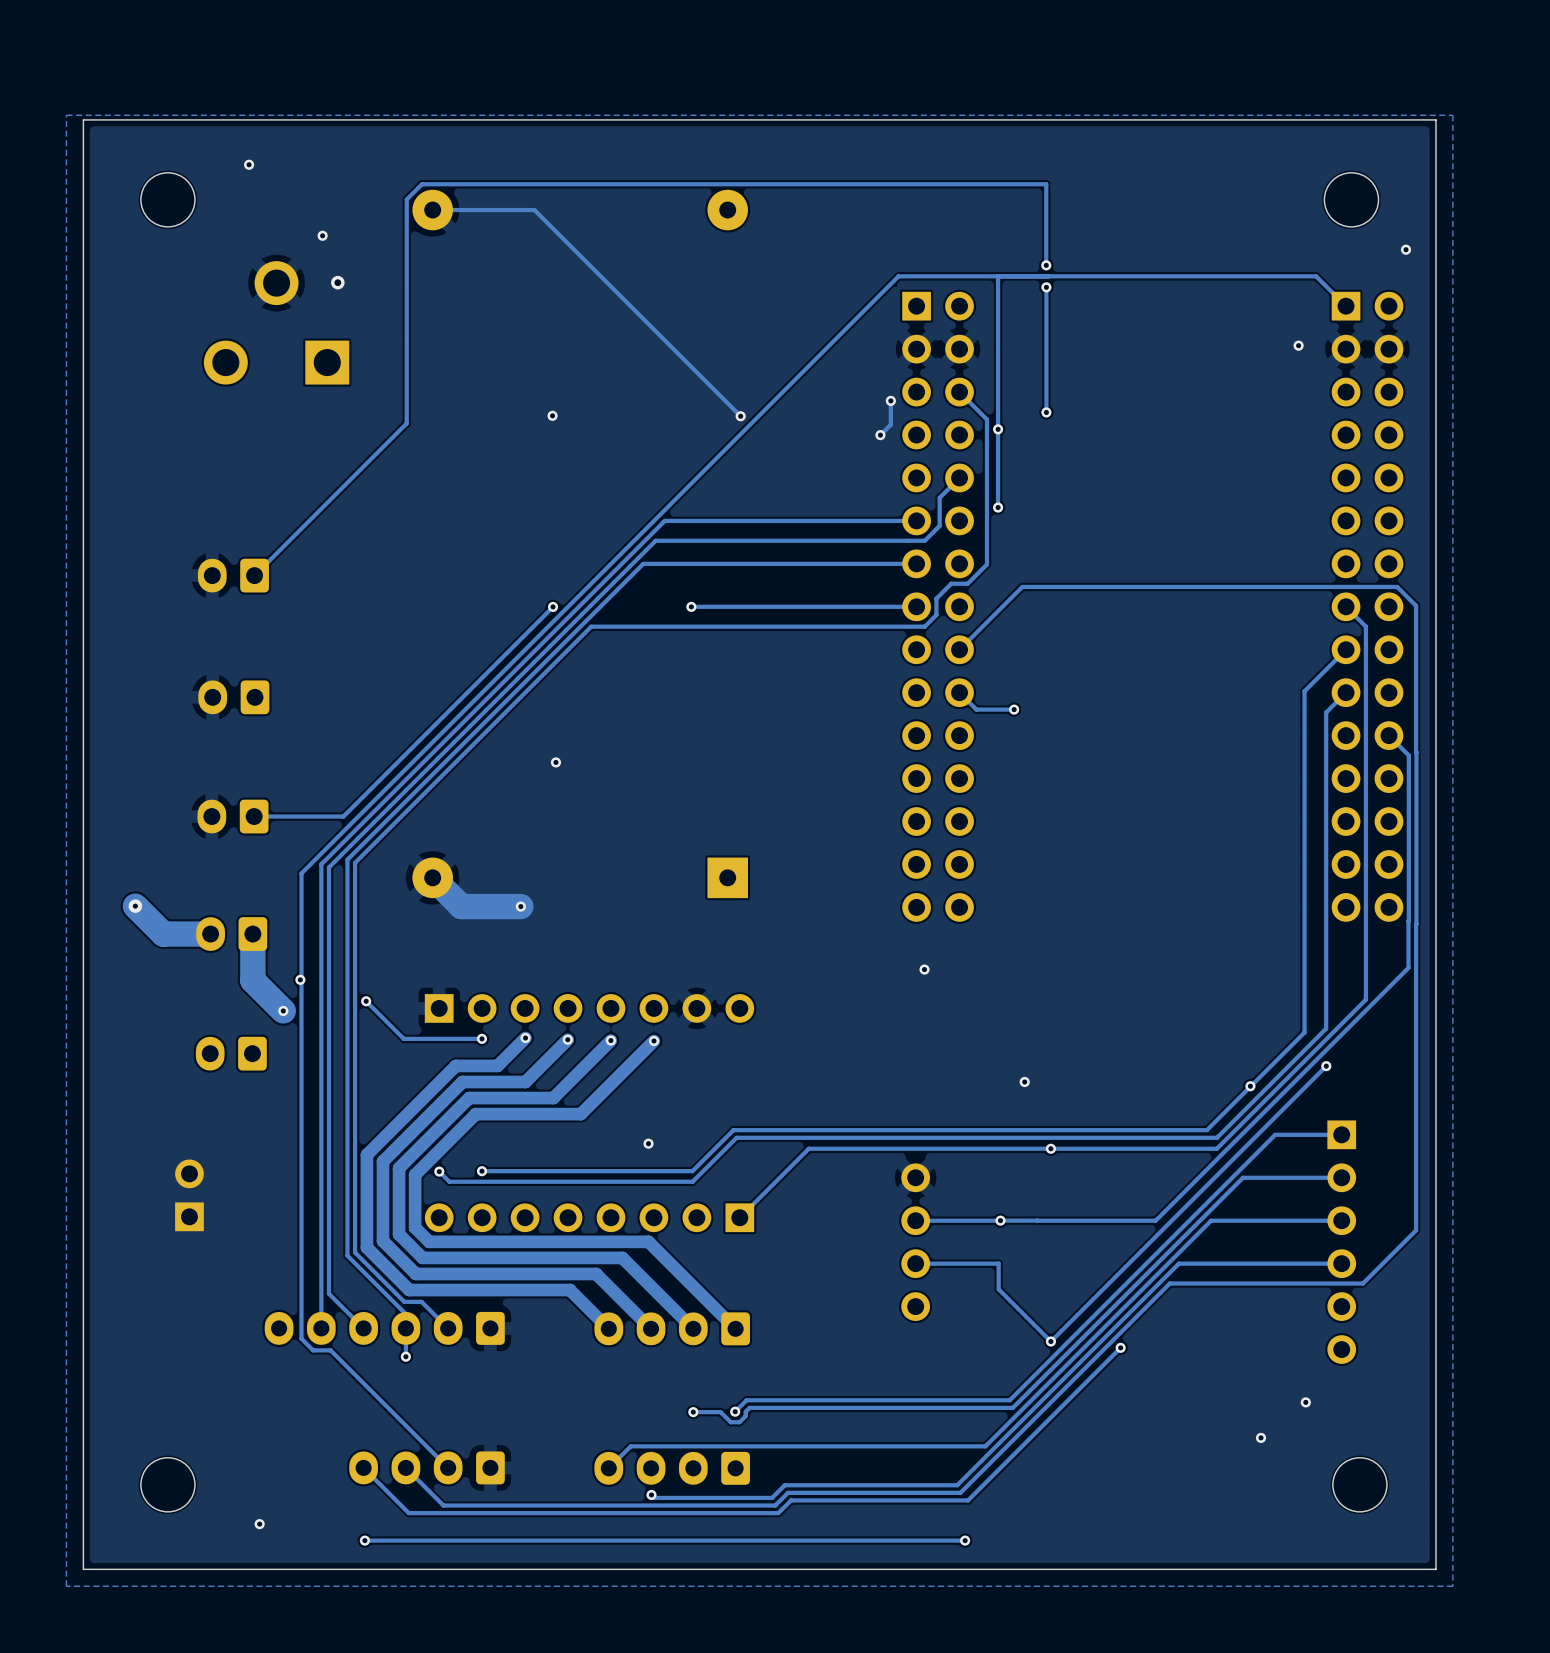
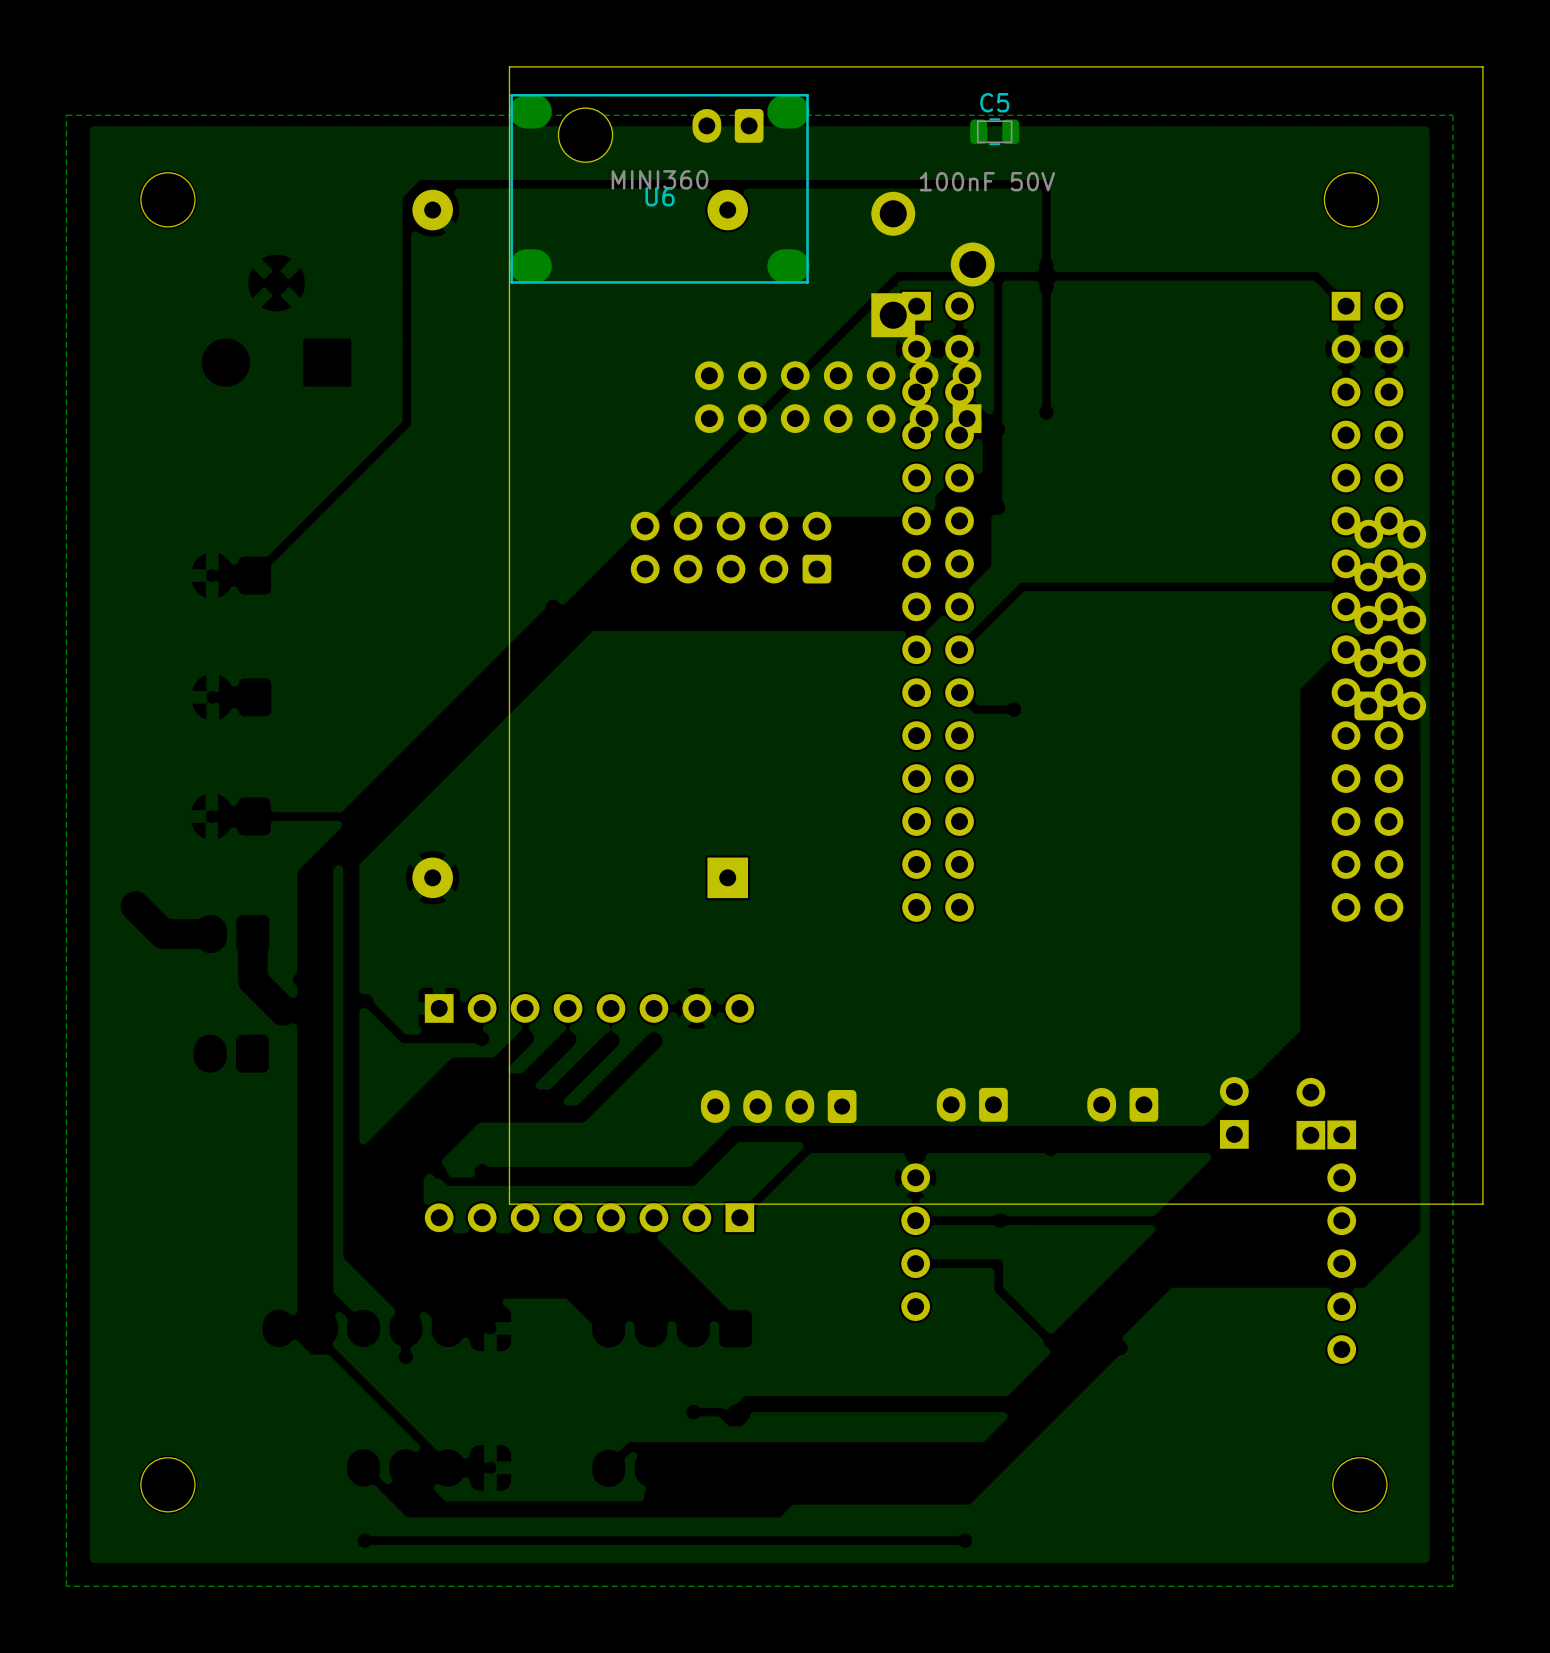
board edge: none -> (1482, 66) (509, 66) (509, 1204) (1482, 1204) (1482, 66)
board edge: (1435, 119) (83, 119) (83, 1569) (1435, 1569) (1435, 119) -> none
part: none -> (727, 125)
C5: none -> 100nF 50V (994, 131)
part: none -> (585, 135)
via: (249, 164) -> none
U6: none -> MINI360 (659, 188)
track: (432, 210) (534, 210) (740, 416) -> none
via: (322, 235) -> none
via: (1405, 249) -> none
part: none -> (932, 264)
track: (1046, 265) (1046, 184) (422, 184) (406, 199) (406, 423) (254, 575) -> none
via: (1046, 265) -> none
track: (998, 276) (998, 507) -> none
via: (337, 282) -> none
track: (1046, 287) (1046, 412) -> none
via: (1046, 287) -> none
track: (1346, 306) (1316, 276) (898, 276) (301, 873) (301, 1338) (313, 1350) (330, 1350) (448, 1467) -> none
part: (276, 322) -> none
via: (1298, 345) -> none
track: (959, 392) (987, 419) (987, 564) (967, 583) (951, 583) (936, 598) (936, 615) (924, 626) (591, 626) (355, 862) (355, 1252) (404, 1301) (421, 1301) (448, 1328) -> none
part: none -> (838, 397)
track: (890, 400) (890, 424) (880, 435) -> none
via: (890, 400) -> none
via: (1046, 412) -> none
via: (552, 415) -> none
via: (740, 416) -> none
via: (998, 429) -> none
via: (880, 435) -> none
track: (959, 477) (939, 497) (939, 525) (924, 540) (655, 540) (328, 867) (328, 1293) (363, 1328) -> none
via: (998, 507) -> none
track: (916, 520) (664, 520) (321, 864) (321, 1328) -> none
part: none -> (731, 547)
track: (916, 563) (643, 563) (347, 859) (347, 1255) (405, 1314) (405, 1356) -> none
part: (233, 575) -> none
track: (553, 606) (343, 816) (254, 816) -> none
via: (553, 606) -> none
via: (691, 606) -> none
track: (916, 606) (691, 606) -> none
track: (1346, 606) (1365, 626) (1365, 999) (1216, 1148) (808, 1148) (739, 1217) -> none
part: none -> (1390, 620)
track: (959, 649) (1022, 586) (1397, 586) (1416, 605) (1416, 1230) (1362, 1283) (1169, 1283) (960, 1492) (787, 1492) (775, 1505) (443, 1505) (405, 1467) -> none
track: (1346, 649) (1304, 691) (1304, 1032) (1206, 1130) (733, 1130) (692, 1171) (481, 1171) -> none
track: (959, 692) (976, 709) (1014, 709) -> none
track: (1346, 692) (1326, 712) (1326, 1028) (1217, 1137) (736, 1137) (692, 1181) (449, 1181) (439, 1171) -> none
part: (233, 697) -> none
via: (1014, 709) -> none
track: (1388, 735) (1408, 755) (1408, 967) (1155, 1220) (915, 1220) -> none
via: (555, 762) -> none
part: (233, 816) -> none
track: (432, 877) (461, 906) (520, 906) -> none
track: (135, 906) (163, 934) (210, 934) -> none
via: (135, 906) -> none
via: (520, 906) -> none
part: (231, 934) -> none
track: (252, 934) (252, 980) (283, 1010) -> none
via: (924, 969) -> none
via: (300, 979) -> none
track: (366, 1001) (403, 1038) (481, 1038) -> none
via: (366, 1001) -> none
via: (283, 1010) -> none
via: (481, 1038) -> none
track: (525, 1038) (497, 1065) (455, 1065) (366, 1154) (366, 1247) (409, 1290) (569, 1290) (608, 1328) -> none
via: (525, 1038) -> none
track: (567, 1039) (525, 1081) (462, 1081) (382, 1161) (382, 1241) (415, 1273) (596, 1273) (651, 1328) -> none
via: (567, 1039) -> none
track: (610, 1040) (553, 1098) (469, 1098) (399, 1168) (399, 1234) (422, 1257) (622, 1257) (693, 1328) -> none
via: (610, 1040) -> none
track: (654, 1040) (580, 1114) (475, 1114) (415, 1174) (415, 1227) (429, 1241) (648, 1241) (735, 1328) -> none
via: (654, 1040) -> none
part: (231, 1053) -> none
track: (1326, 1066) (1050, 1341) (998, 1289) (998, 1263) (915, 1263) -> none
via: (1326, 1066) -> none
via: (1024, 1081) -> none
via: (1250, 1086) -> none
part: none -> (972, 1104)
part: none -> (1122, 1104)
part: none -> (778, 1106)
part: none -> (1234, 1112)
part: none -> (1310, 1113)
track: (1341, 1134) (1275, 1134) (1009, 1400) (746, 1400) (735, 1411) -> none
via: (648, 1143) -> none
via: (1050, 1148) -> none
via: (439, 1171) -> none
via: (481, 1171) -> none
track: (1341, 1177) (1243, 1177) (1012, 1407) (749, 1407) (739, 1422) (730, 1422) (720, 1412) (693, 1412) -> none
part: (189, 1195) -> none
via: (1000, 1220) -> none
track: (1341, 1220) (1211, 1220) (985, 1446) (630, 1446) (608, 1468) -> none
track: (1341, 1263) (1178, 1263) (957, 1485) (784, 1485) (772, 1497) (654, 1497) (651, 1494) -> none
part: (384, 1328) -> none
part: (672, 1328) -> none
via: (1050, 1341) -> none
track: (1120, 1347) (968, 1500) (791, 1500) (778, 1513) (408, 1513) (363, 1467) -> none
via: (1120, 1347) -> none
via: (405, 1356) -> none
via: (1305, 1402) -> none
via: (735, 1411) -> none
via: (693, 1412) -> none
via: (1260, 1437) -> none
part: (427, 1467) -> none
part: (672, 1468) -> none
via: (651, 1494) -> none
via: (259, 1524) -> none
via: (364, 1540) -> none
track: (965, 1540) (364, 1540) -> none
via: (965, 1540) -> none

